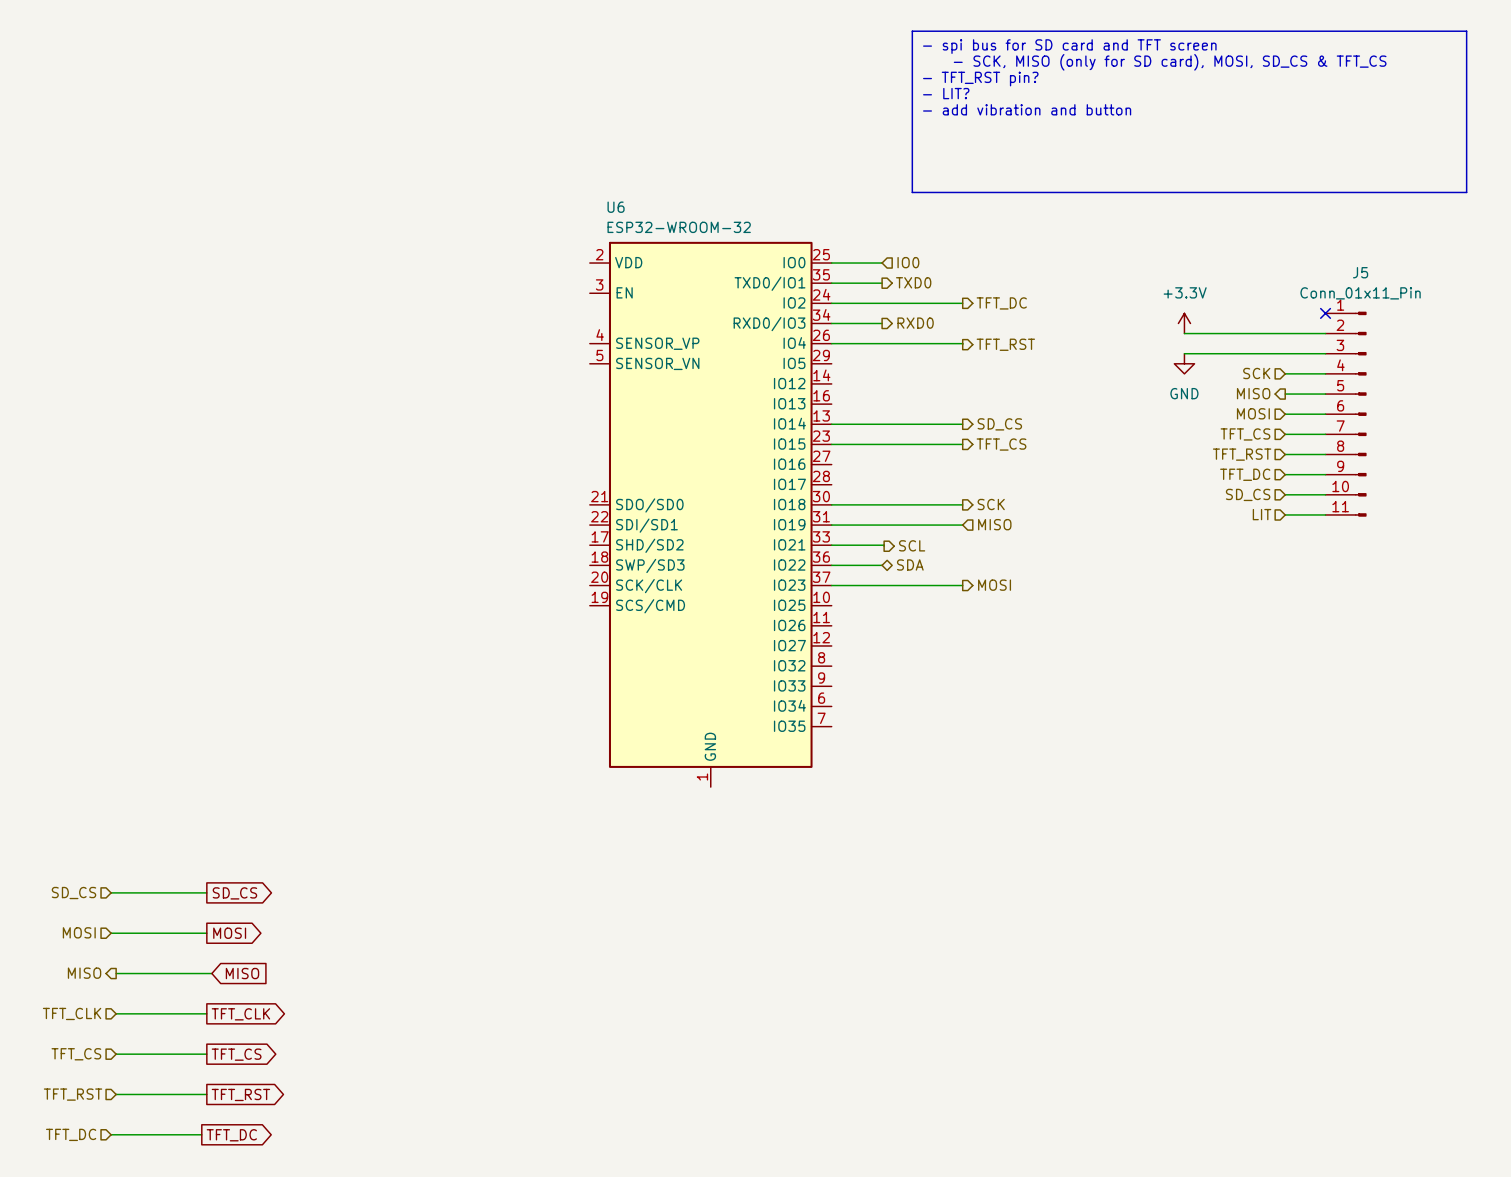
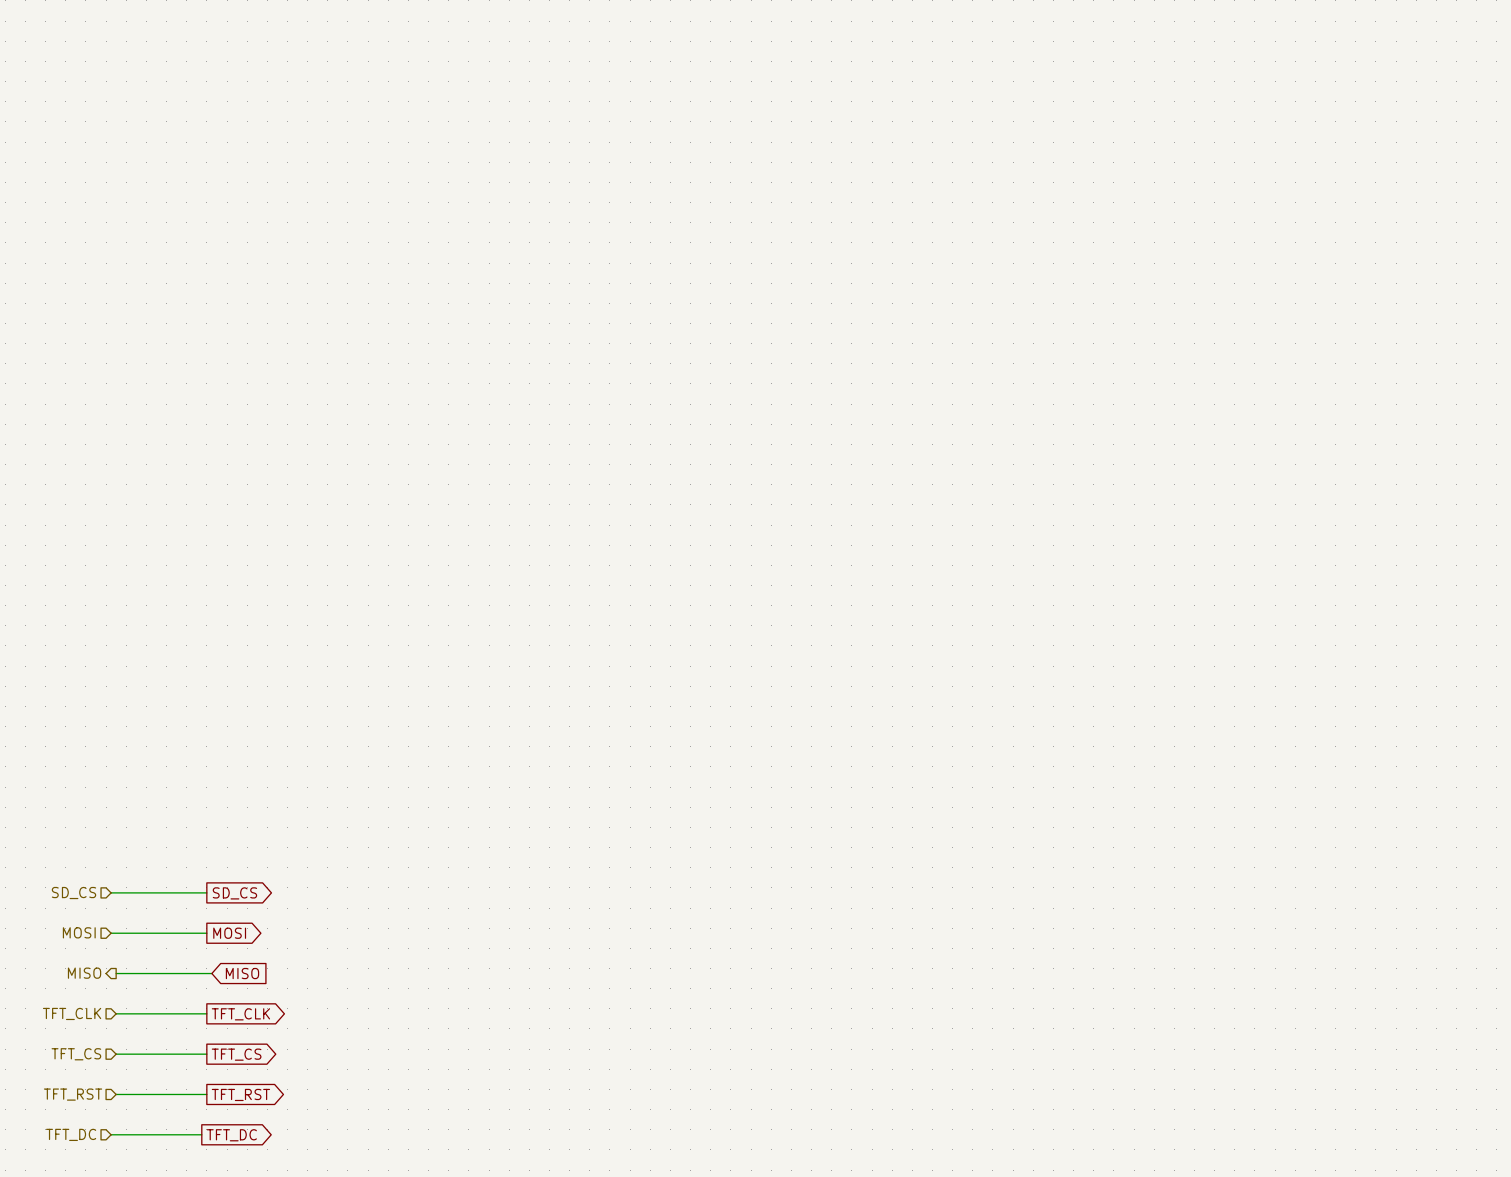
line: (912, 31) (1466, 31) (1466, 192) (912, 192) (912, 31) -> none
text: - spi bus for SD card and TFT screen (1069, 46) -> none
text: - SCK, MISO (only for SD card), MOSI, SD_CS & TFT_CS (1170, 62) -> none
text: - TFT_RST pin? (980, 79) -> none
text: - LIT? (946, 93) -> none
text: - add vibration and button (1027, 109) -> none
hierarchical label: IO0 (908, 262) -> none
wire: (831, 263) (882, 263) -> none
hierarchical label: TXD0 (913, 282) -> none
wire: (831, 283) (882, 283) -> none
wire: (831, 303) (962, 303) -> none
hierarchical label: TFT_DC (1001, 303) -> none
no-connect mark: (1325, 313) -> none
wire: (831, 323) (882, 323) -> none
hierarchical label: RXD0 (915, 323) -> none
power symbol: +3.3V (1184, 323) -> none
wire: (1184, 333) (1325, 333) -> none
wire: (831, 343) (962, 344) -> none
hierarchical label: TFT_RST (1005, 344) -> none
wire: (1184, 353) (1325, 353) -> none
power symbol: GND (1184, 363) -> none
hierarchical label: SCK (1256, 373) -> none
wire: (1285, 373) (1325, 373) -> none
hierarchical label: MISO (1253, 393) -> none
wire: (1285, 394) (1325, 394) -> none
hierarchical label: MOSI (1253, 413) -> none
wire: (1285, 414) (1325, 414) -> none
J5: Conn_01x11_Pin (1345, 414) -> none
wire: (831, 424) (962, 424) -> none
hierarchical label: SD_CS (999, 424) -> none
hierarchical label: TFT_CS (1245, 434) -> none
wire: (1285, 434) (1325, 434) -> none
wire: (831, 444) (962, 444) -> none
hierarchical label: TFT_CS (1001, 444) -> none
hierarchical label: TFT_RST (1242, 454) -> none
wire: (1285, 454) (1325, 454) -> none
hierarchical label: TFT_DC (1245, 474) -> none
wire: (1285, 474) (1325, 474) -> none
hierarchical label: SD_CS (1248, 494) -> none
wire: (1285, 494) (1325, 494) -> none
wire: (831, 504) (962, 504) -> none
hierarchical label: SCK (991, 504) -> none
U6: ESP32-WROOM-32 (710, 514) -> none
hierarchical label: LIT (1262, 514) -> none
wire: (1285, 514) (1325, 514) -> none
hierarchical label: MISO (994, 524) -> none
wire: (831, 525) (962, 525) -> none
wire: (831, 545) (884, 546) -> none
hierarchical label: SCL (912, 545) -> none
hierarchical label: SDA (910, 564) -> none
wire: (831, 565) (882, 565) -> none
wire: (831, 585) (962, 585) -> none
hierarchical label: MOSI (994, 585) -> none

